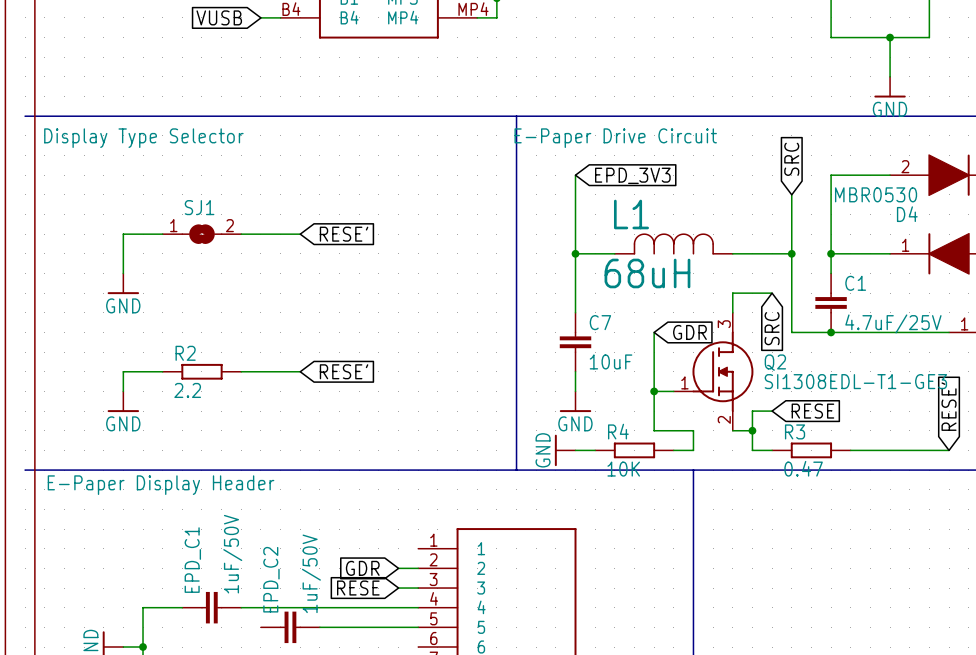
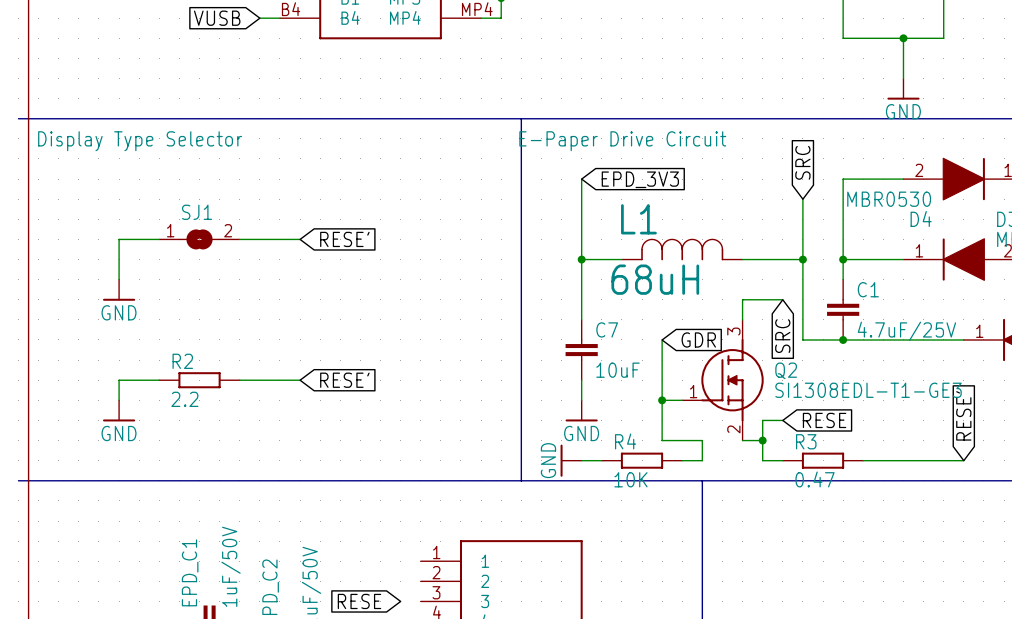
text: E-Paper Display Header (161, 485) -> none
global label: GDR (362, 568) -> none
wire: (398, 568) (418, 568) -> none
wire: (398, 588) (418, 588) -> none

